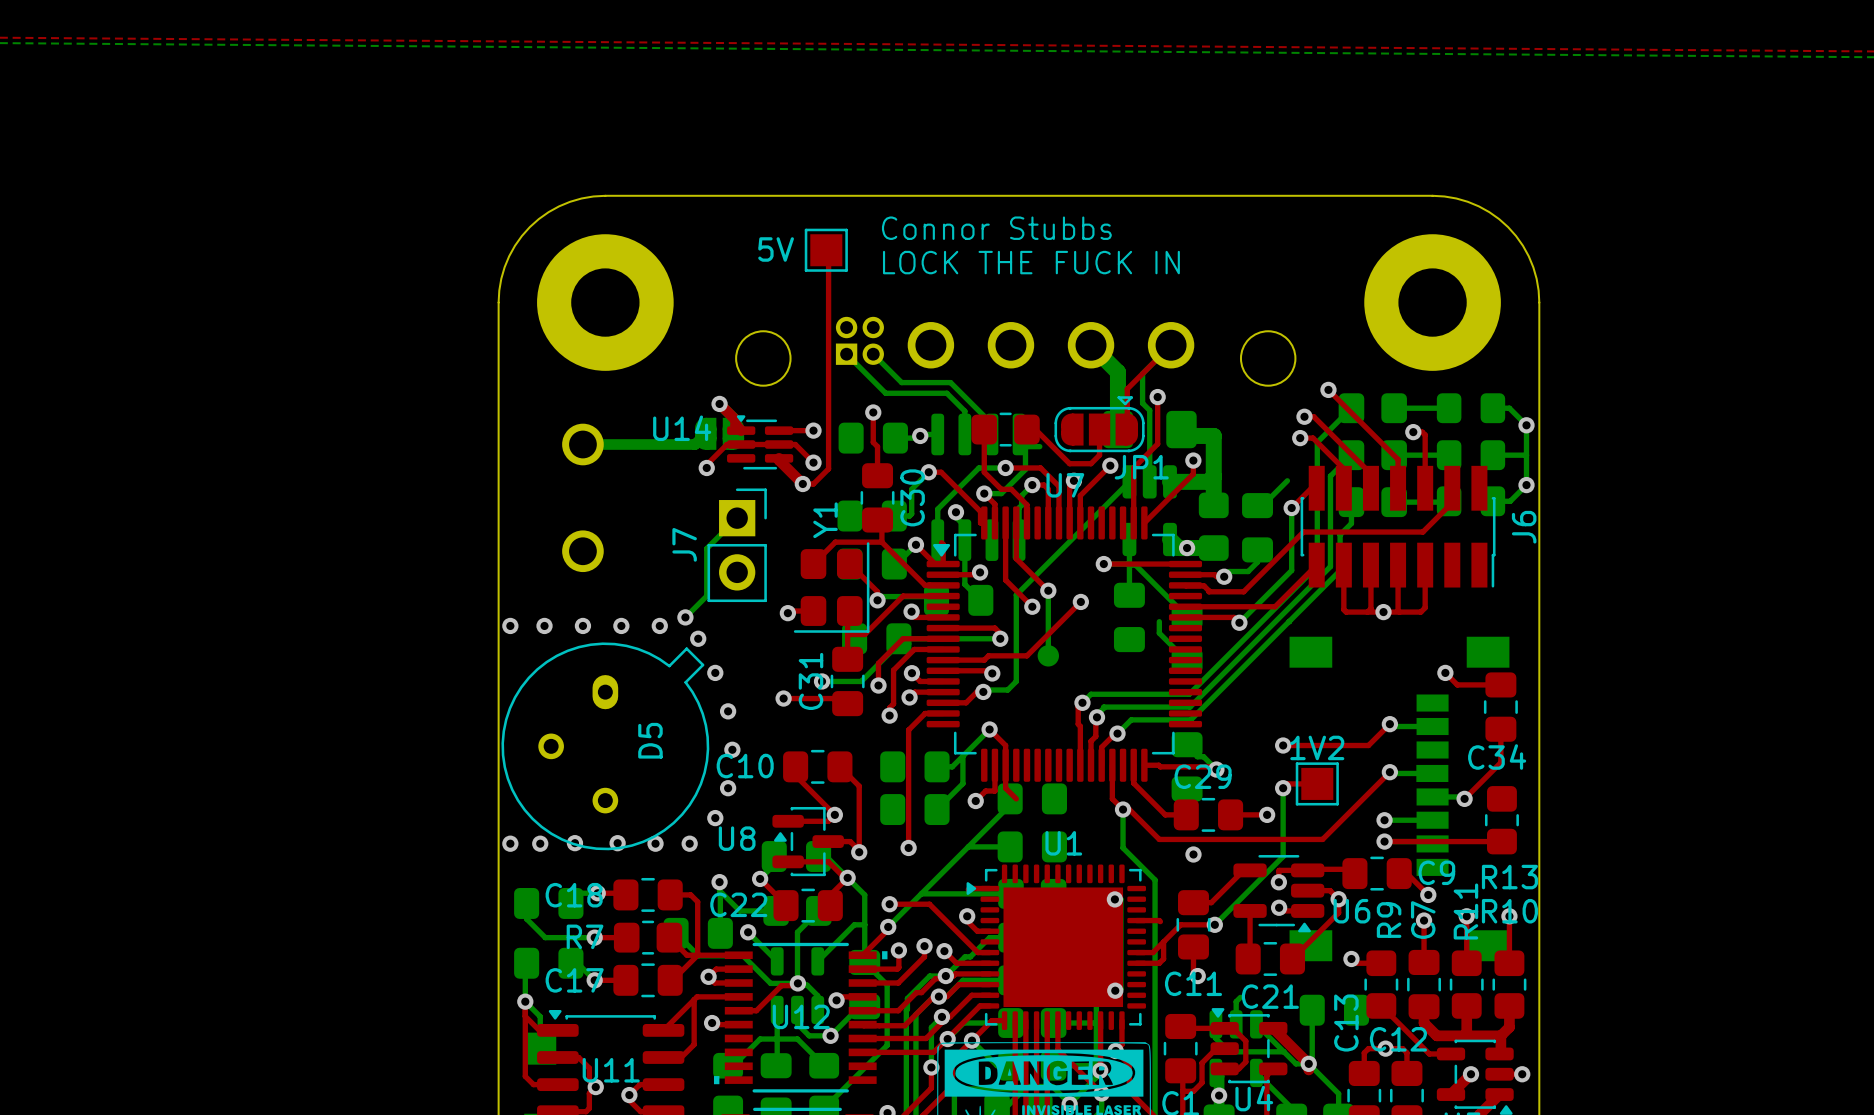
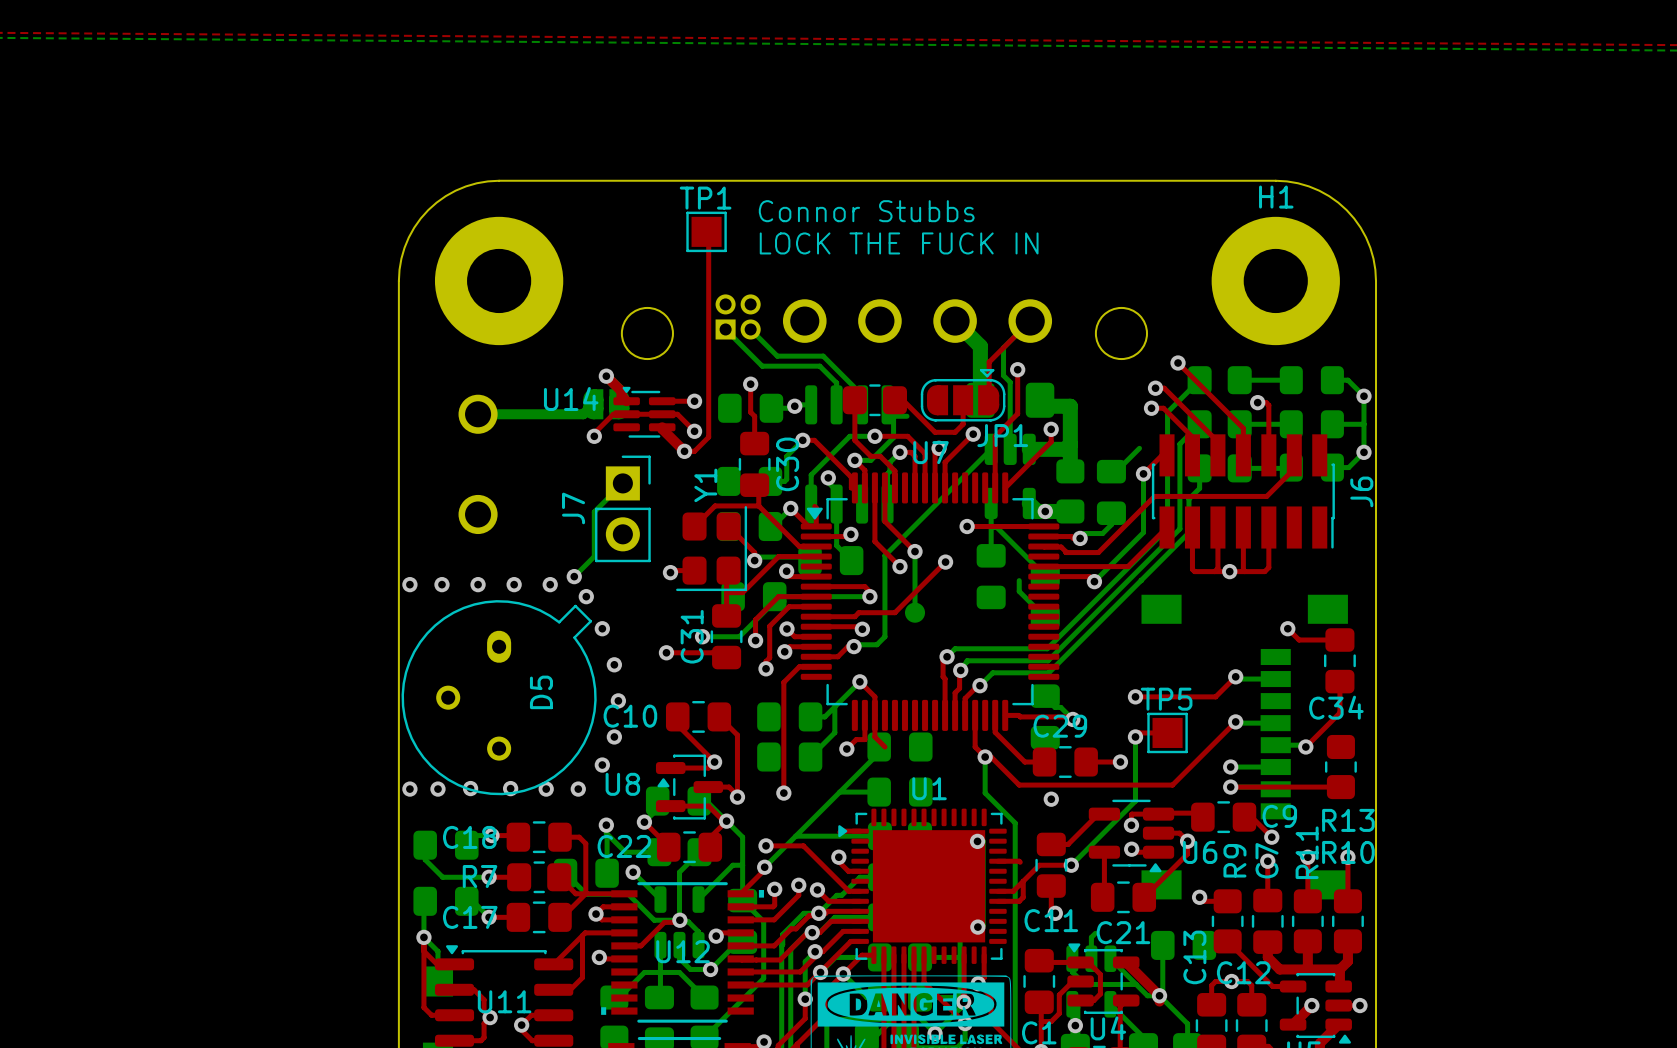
H1 name: none -> H1 (1276, 197)
5V name: 5V (776, 249) -> TP1 (705, 198)
1V2 name: 1V2 (1317, 747) -> TP5 (1166, 699)

